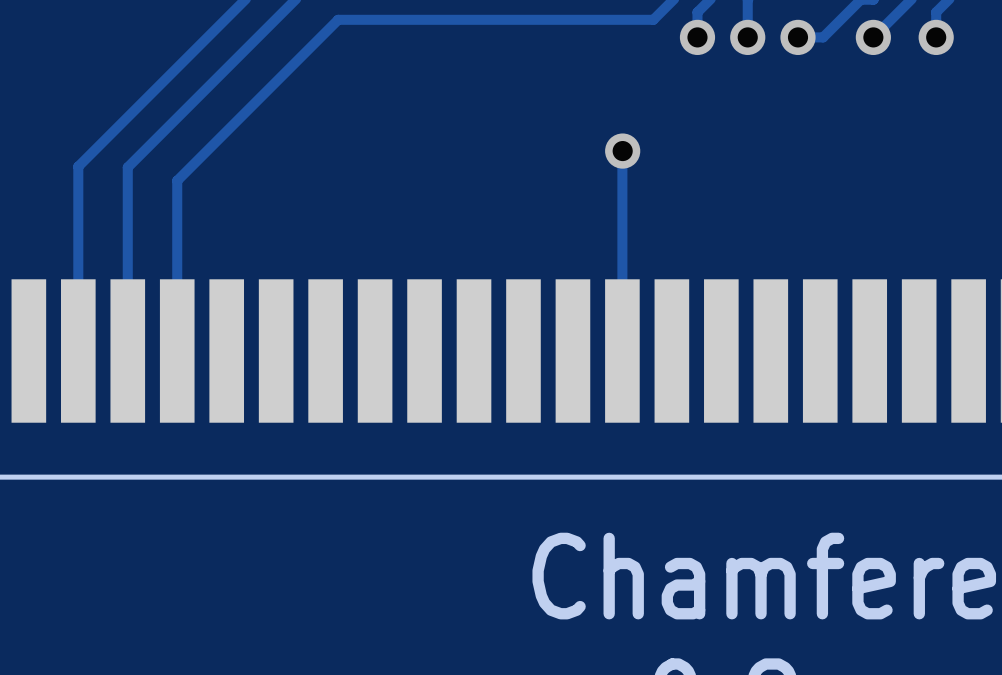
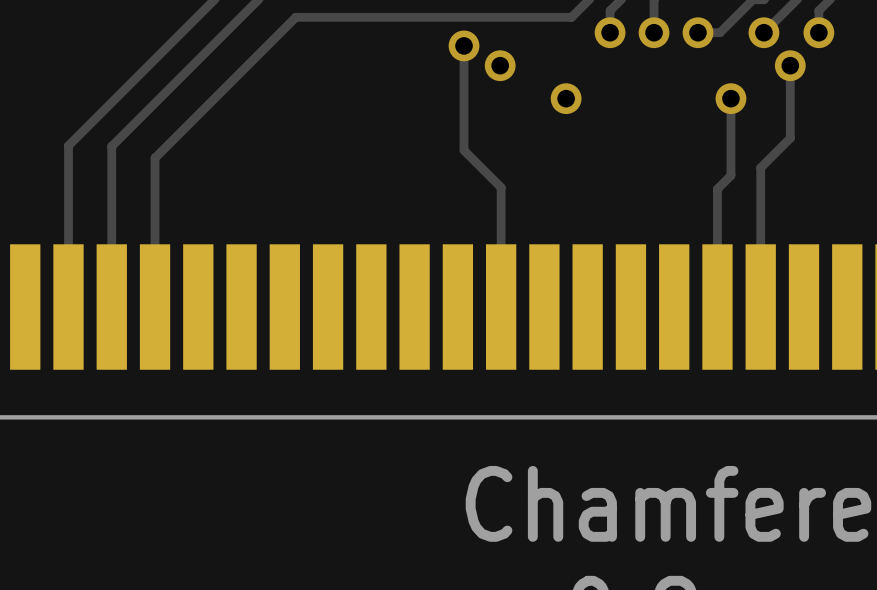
track: none -> (464, 45) (464, 150) (501, 187) (501, 307)
via: none -> (464, 45)
via: none -> (500, 65)
track: none -> (790, 65) (790, 138) (760, 167) (760, 307)
via: none -> (790, 65)
via: none -> (566, 98)
track: none -> (730, 98) (730, 175) (717, 189) (717, 307)
via: none -> (730, 98)
track: (622, 151) (622, 351) -> none
via: (622, 151) -> none

